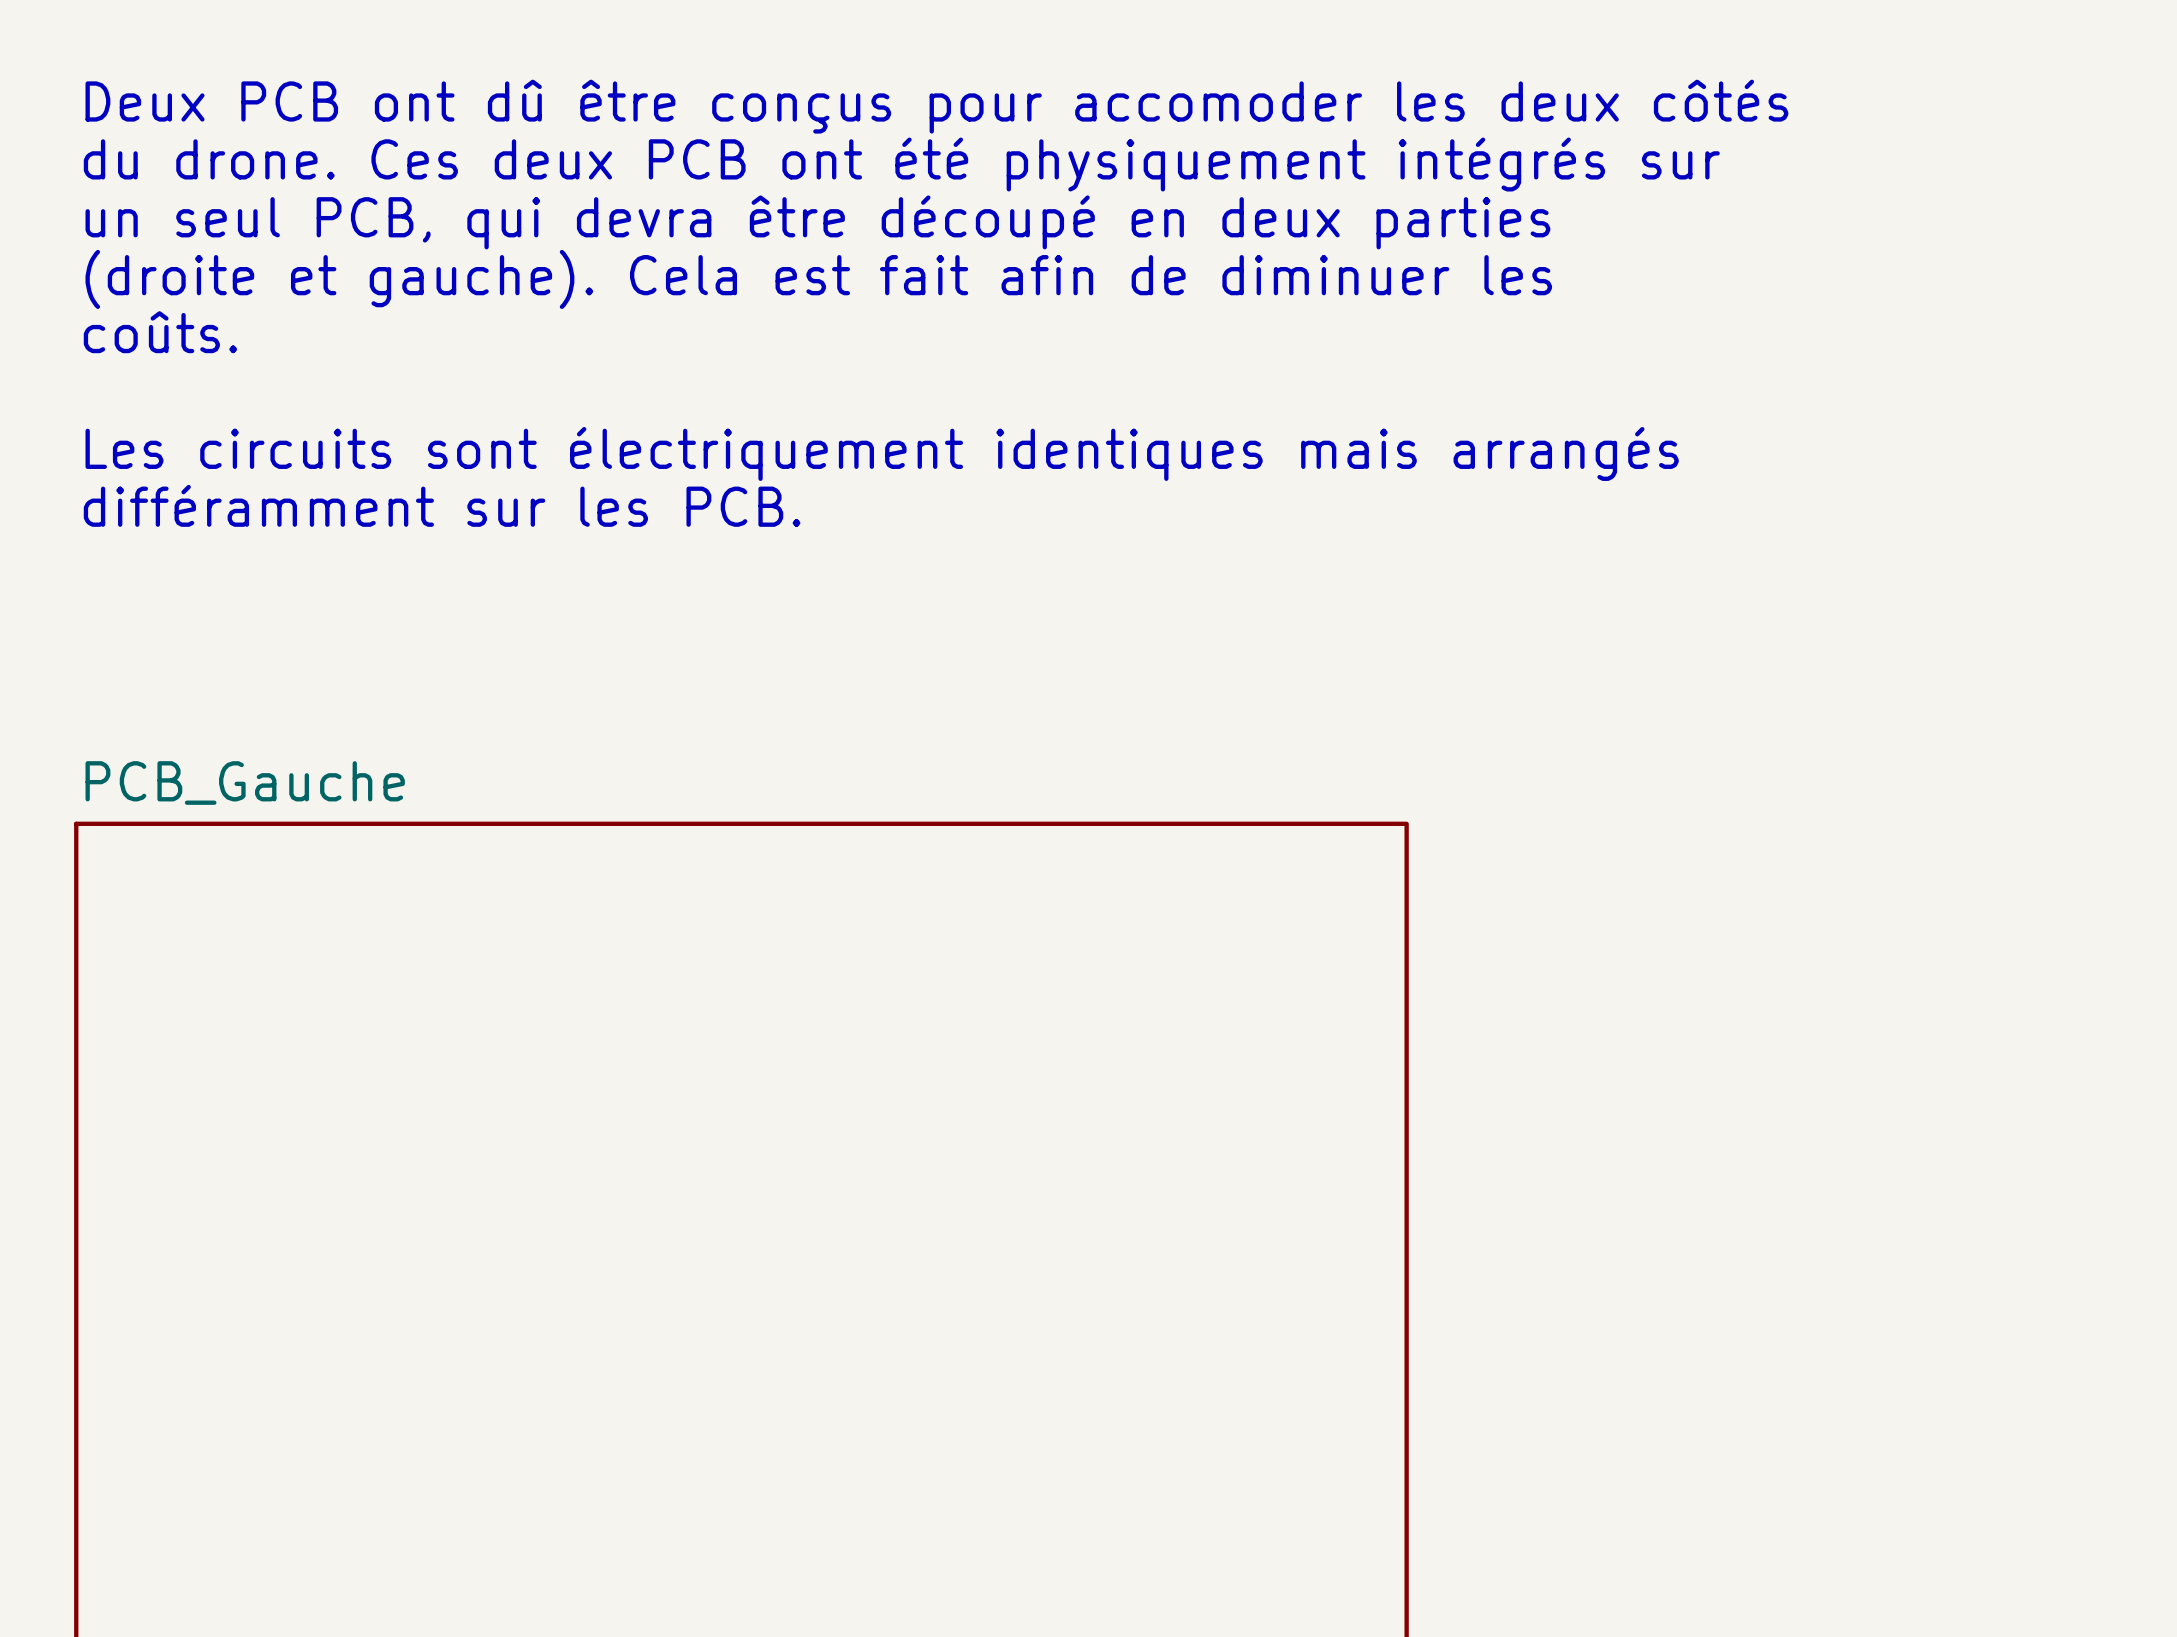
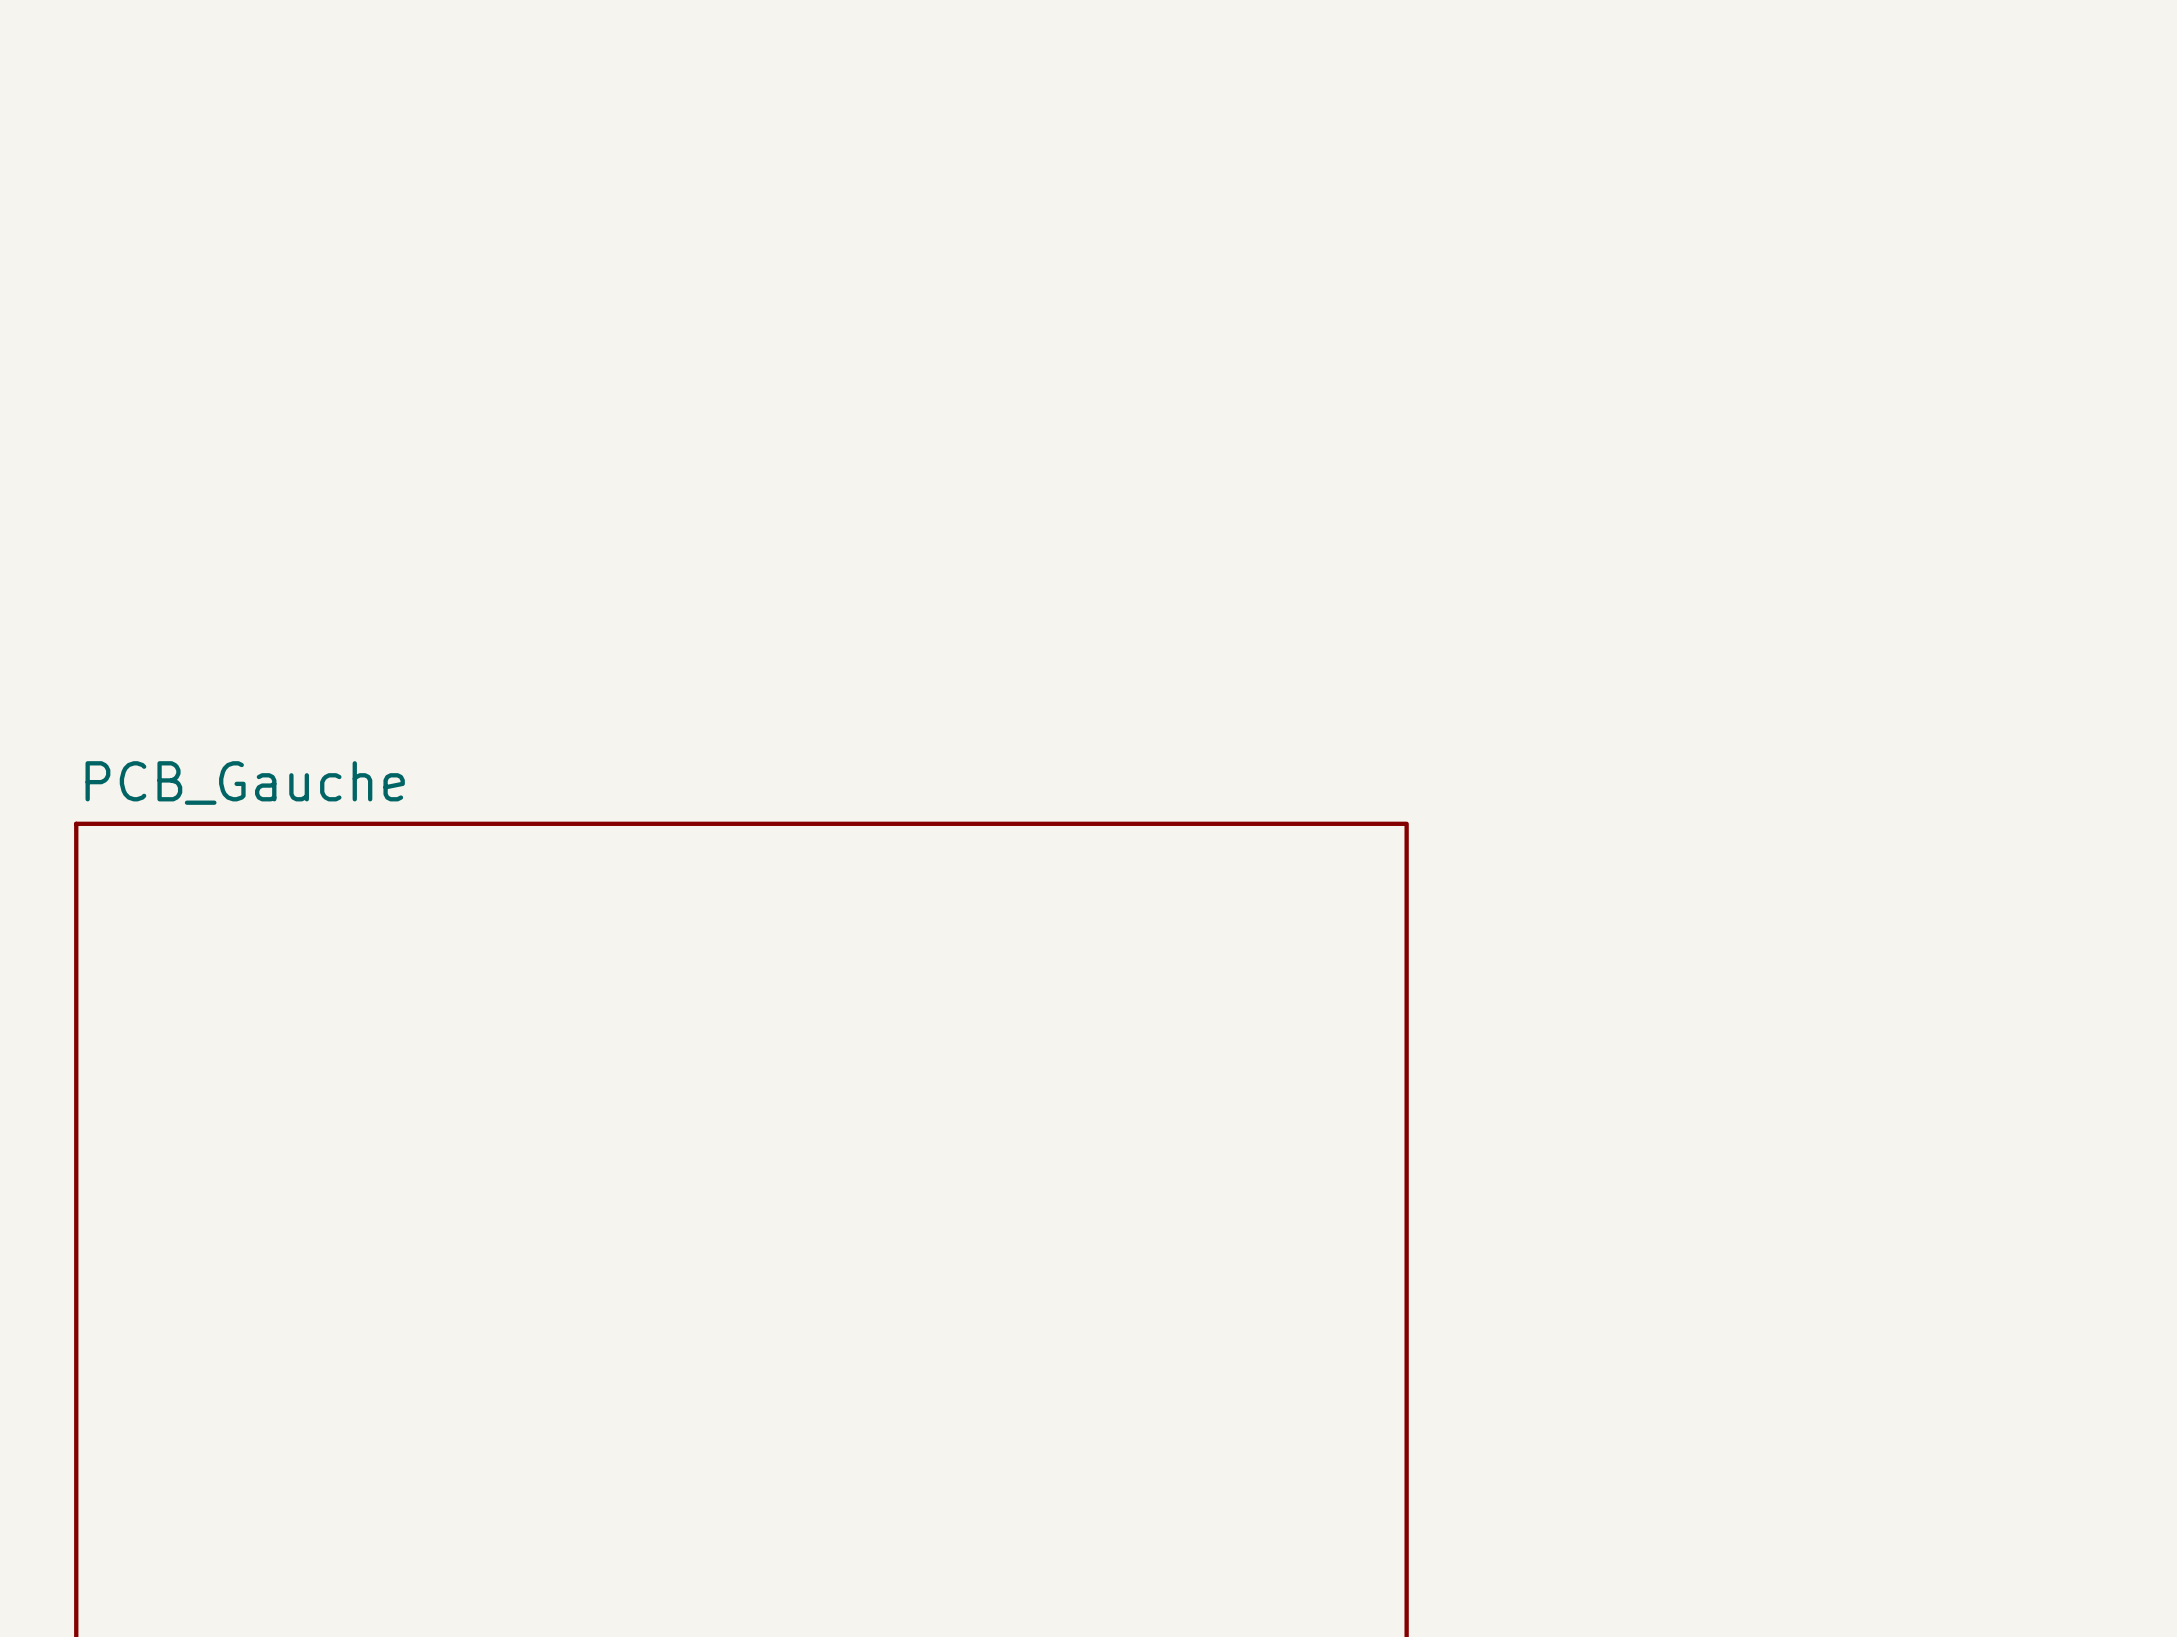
text: Deux PCB ont dû être conçus pour accomoder les deux côtés (936, 106) -> none
text: du drone. Ces deux PCB ont été physiquement intégrés sur (901, 164) -> none
text: un seul PCB, qui devra être découpé en deux parties (817, 222) -> none
text: (droite et gauche). Cela est fait afin de diminuer les (818, 279) -> none
text: coûts. (160, 332) -> none
text: Les circuits sont électriquement identiques mais arrangés (882, 453) -> none
text: différamment sur les PCB. (442, 505) -> none

